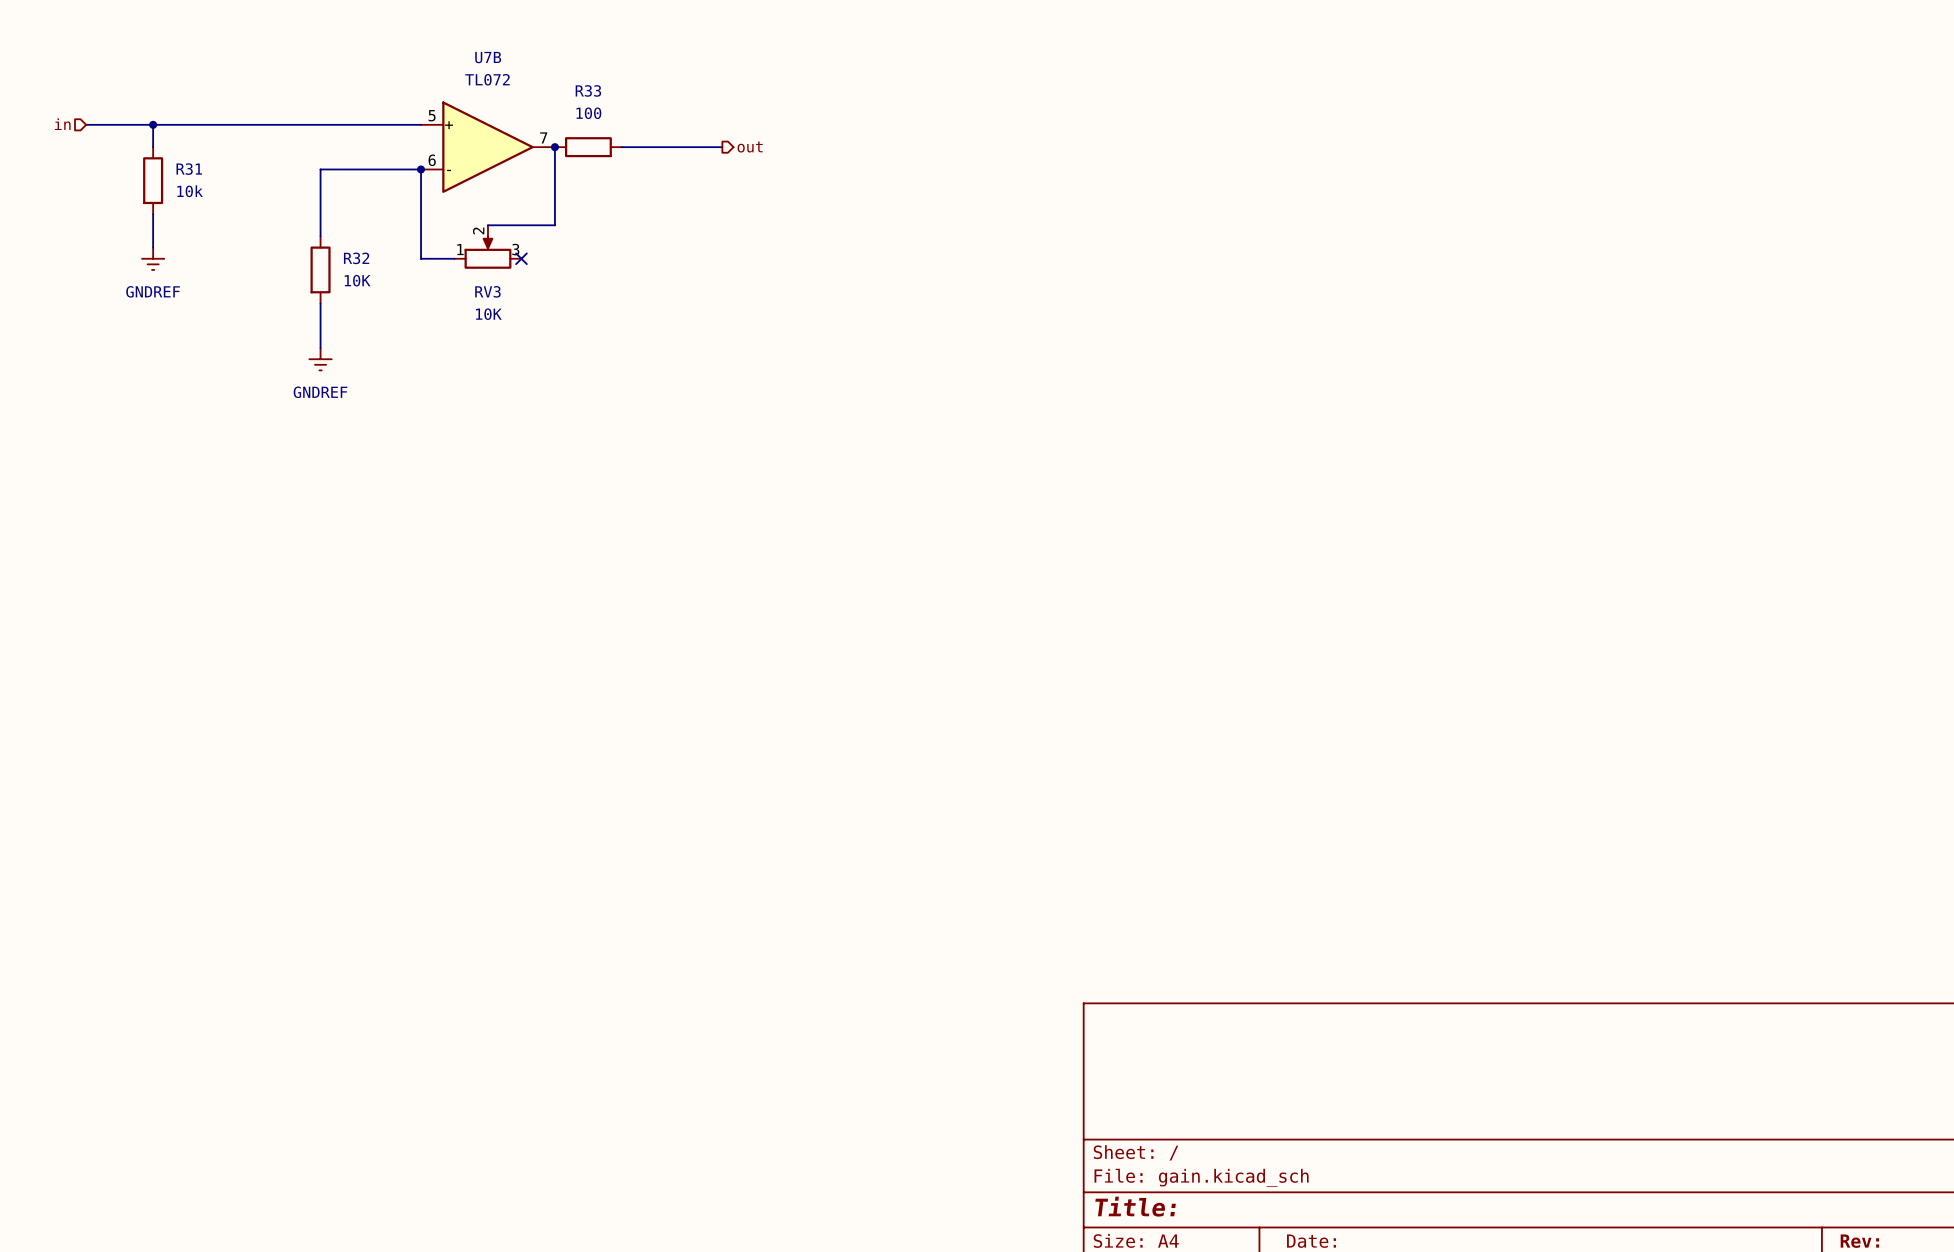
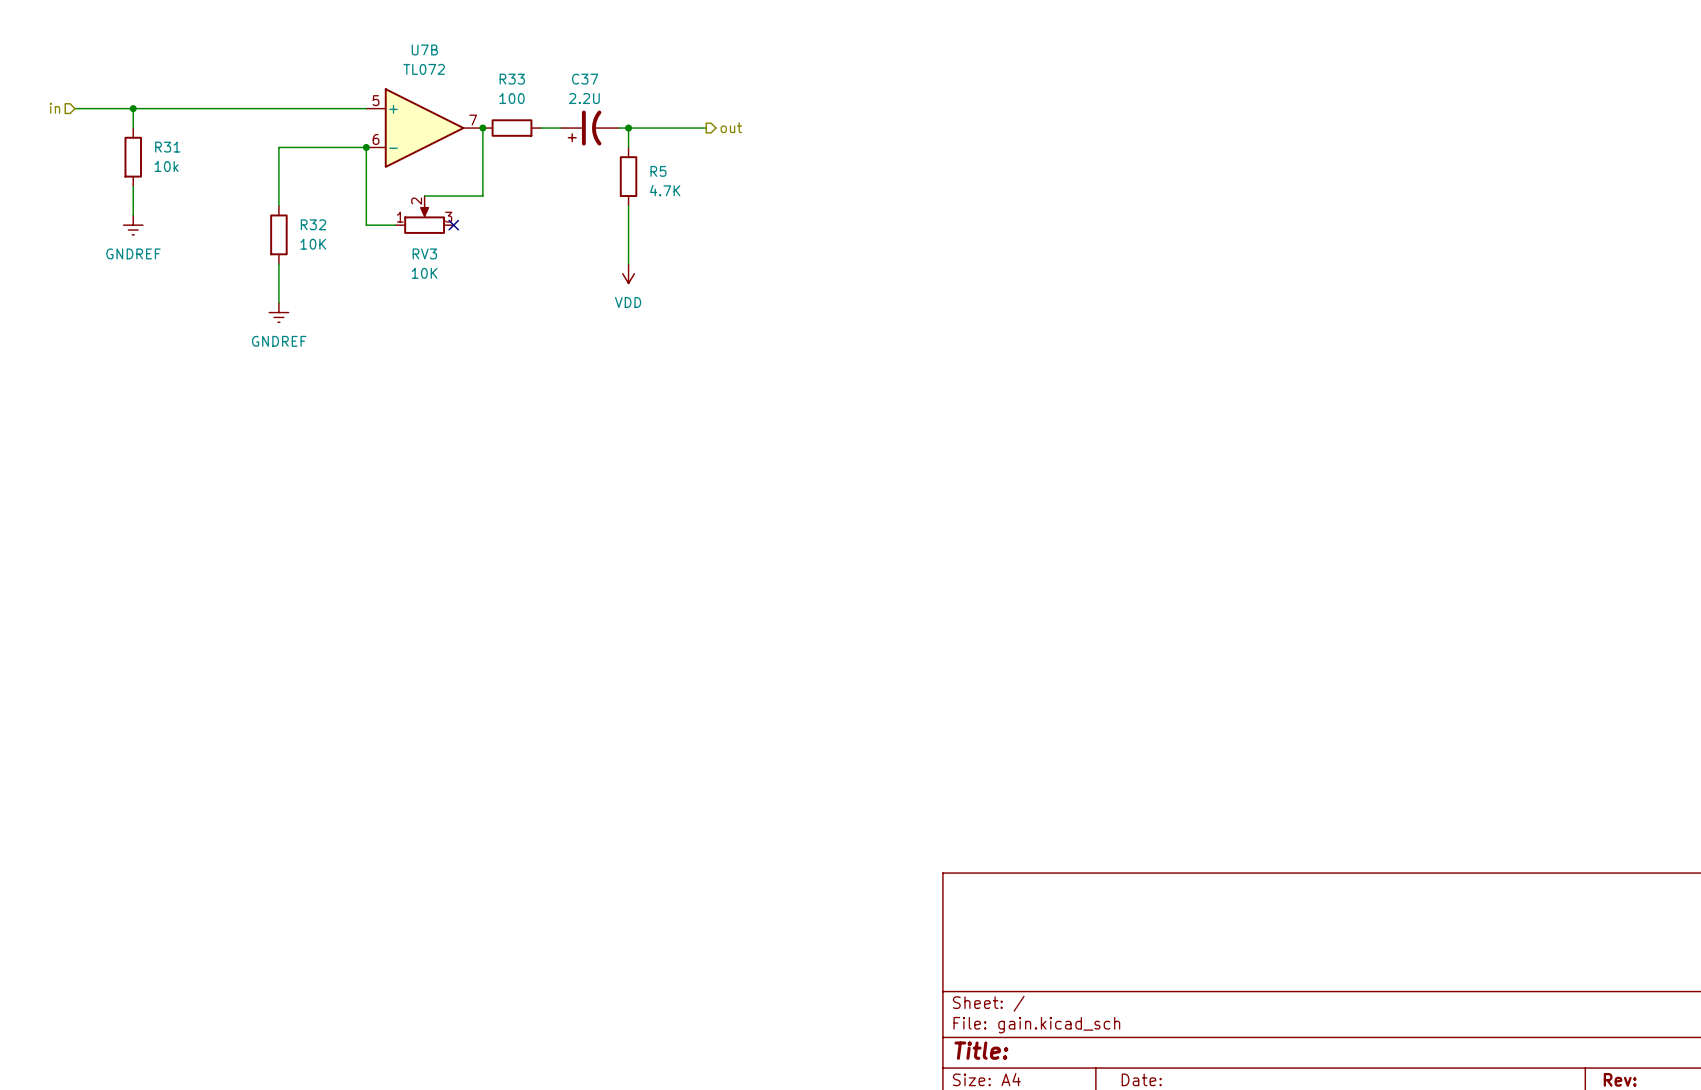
C37: none -> 2.2U (589, 128)
junction: none -> (628, 128)
hierarchical label position: out (750, 147) -> out (731, 127)
wire: none -> (706, 128) (628, 128) (628, 147)
R5: none -> 4.7K (628, 176)
wire: none -> (628, 205) (628, 264)
power symbol: none -> VDD (628, 273)

